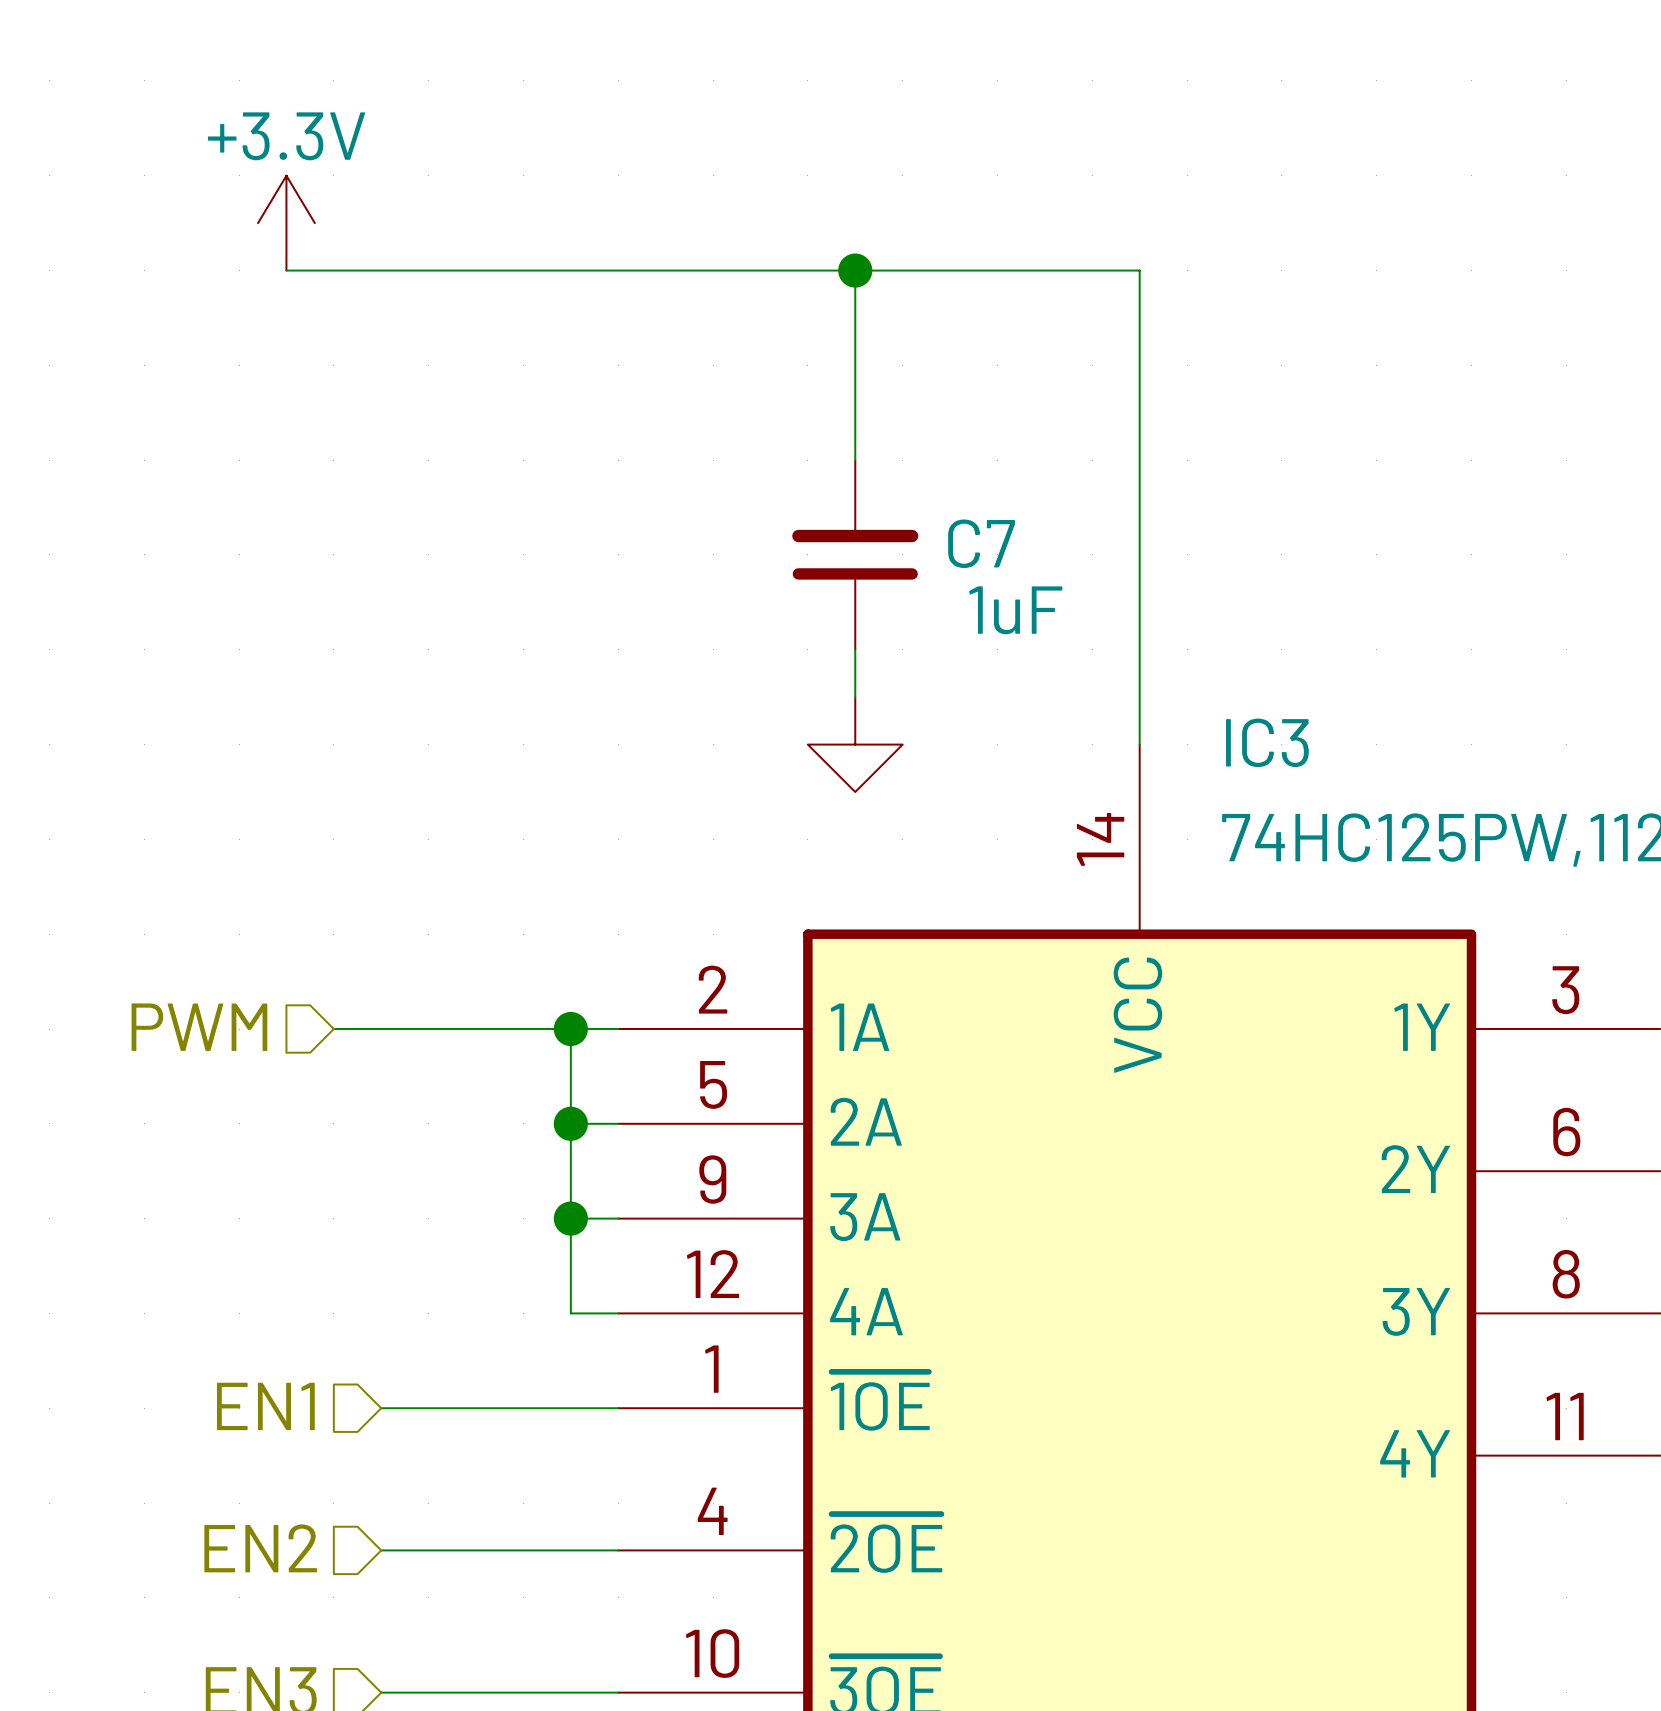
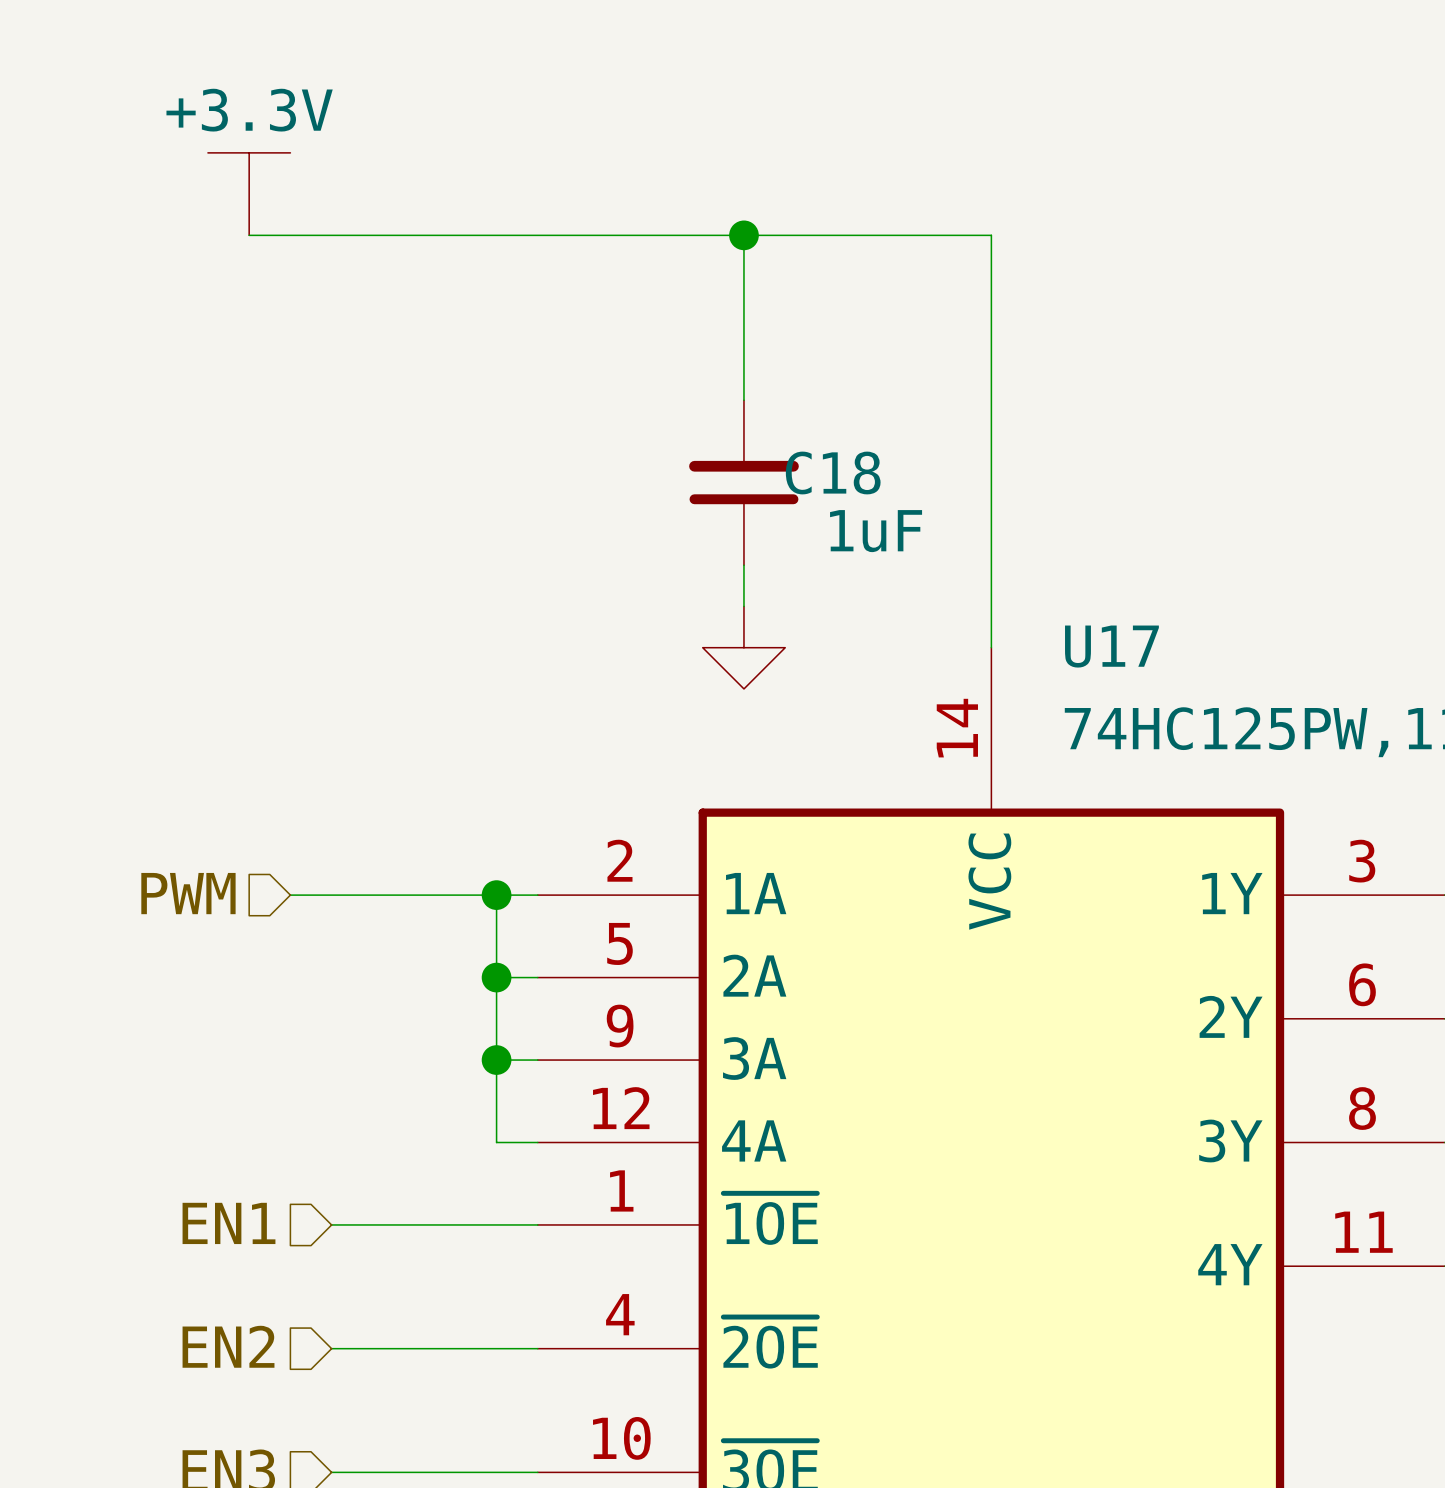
power symbol shape: [258, 175, 315, 271] -> [207, 152, 291, 236]
C7 name: C7 (981, 543) -> C18 (833, 473)
IC3 name: IC3 (1267, 742) -> U17 (1111, 646)

